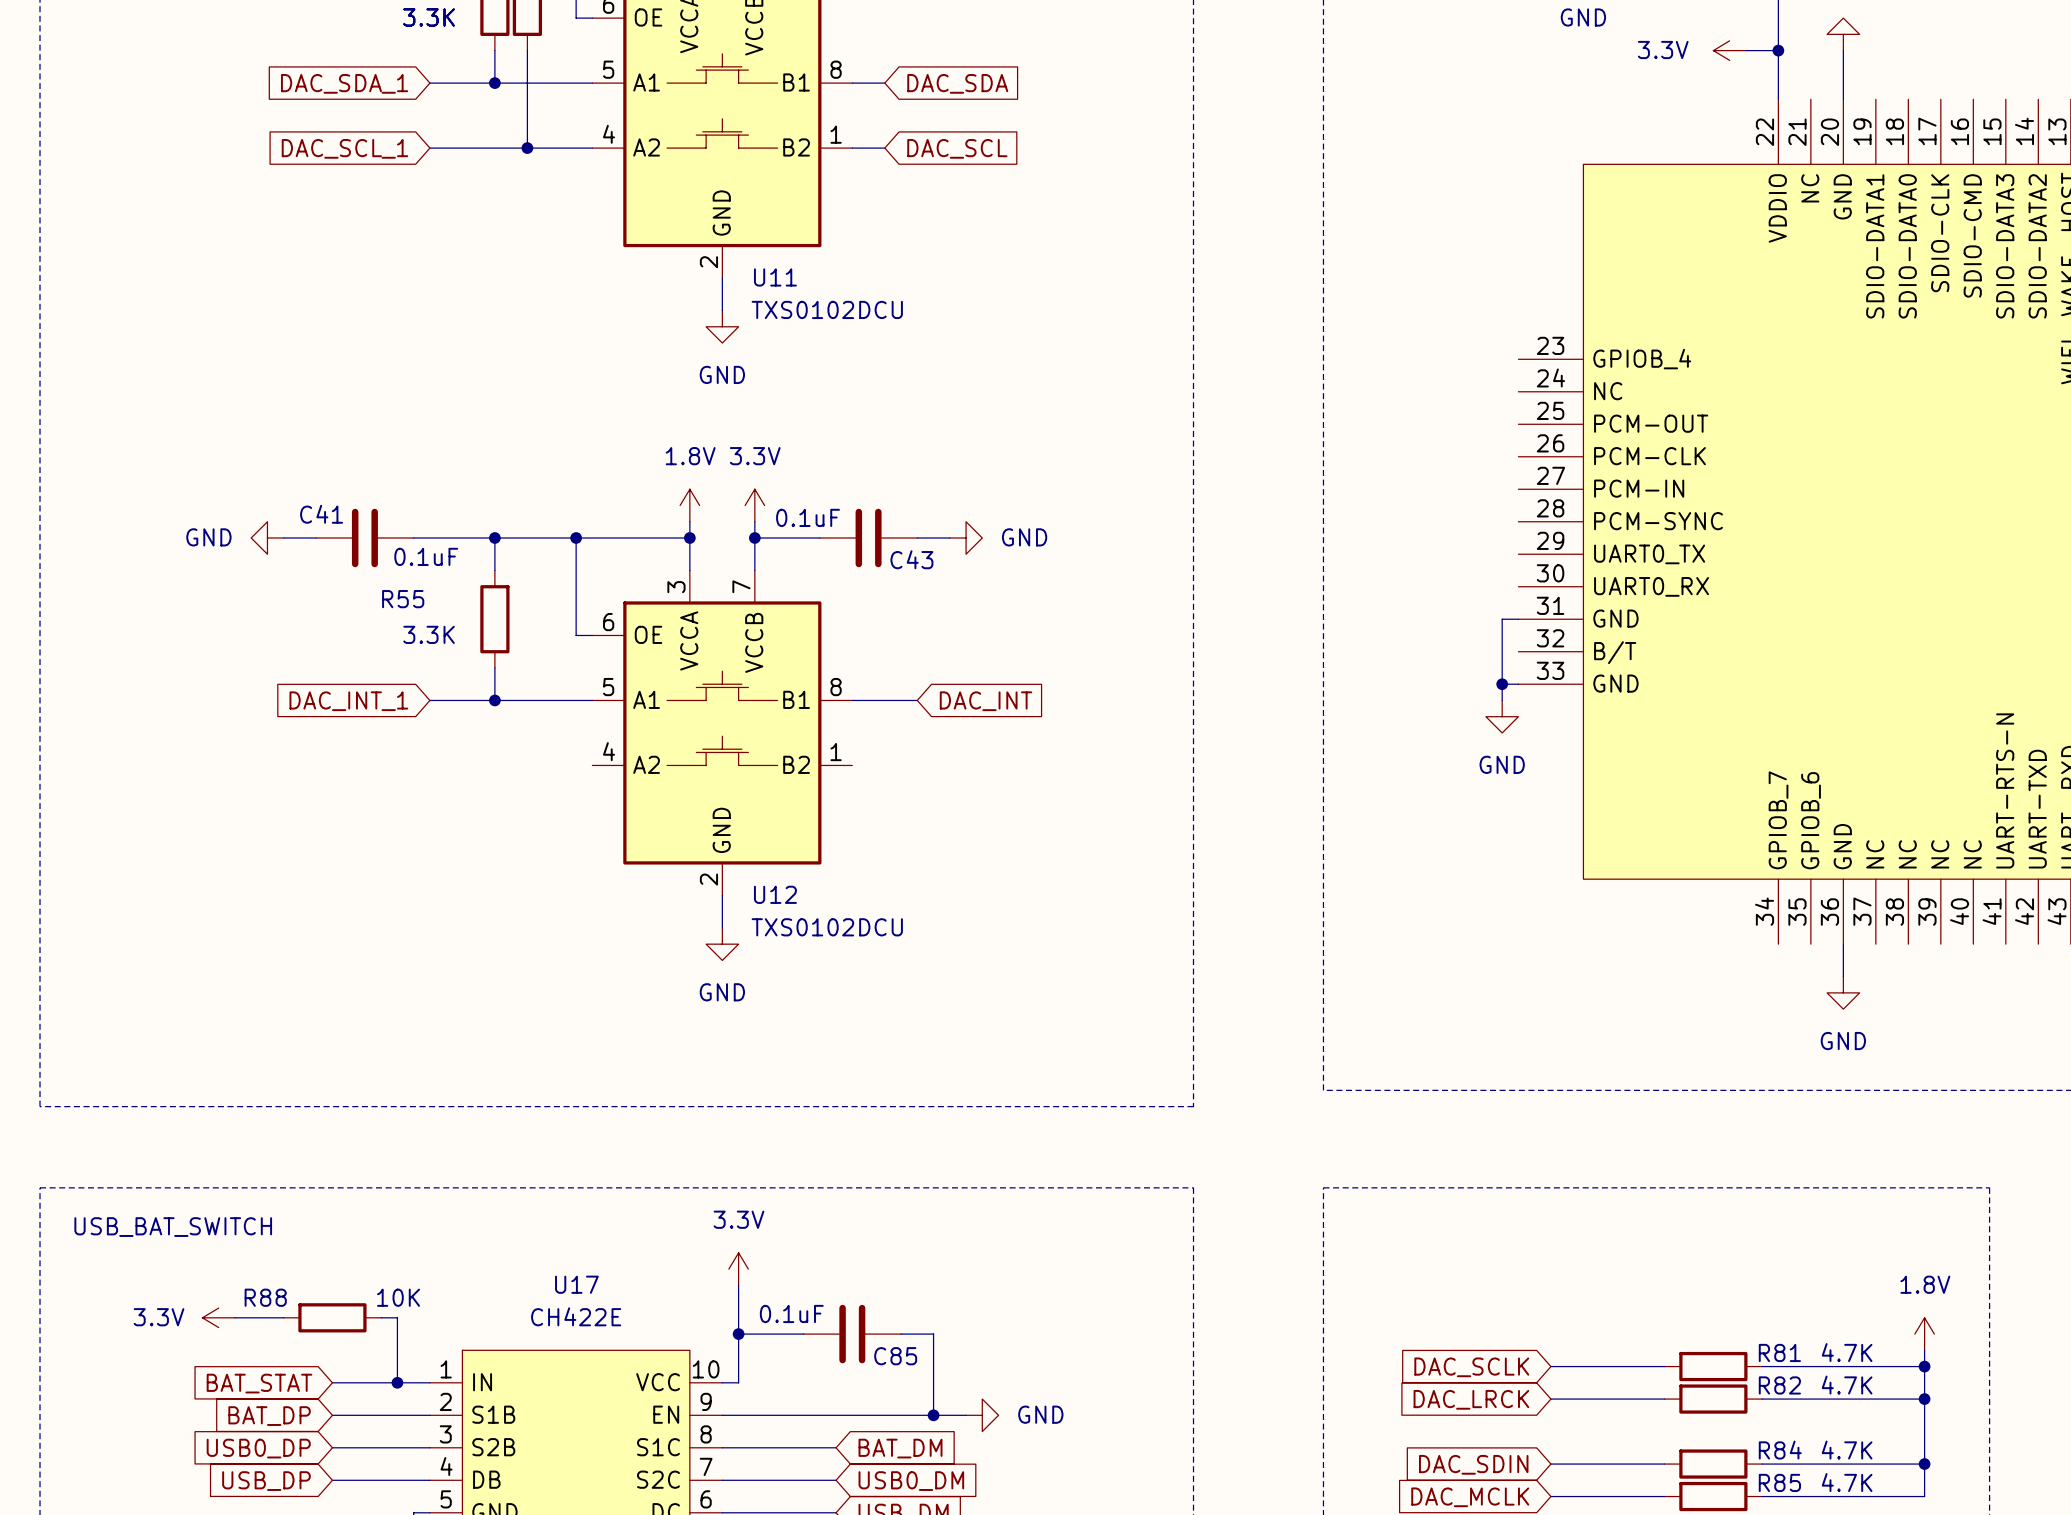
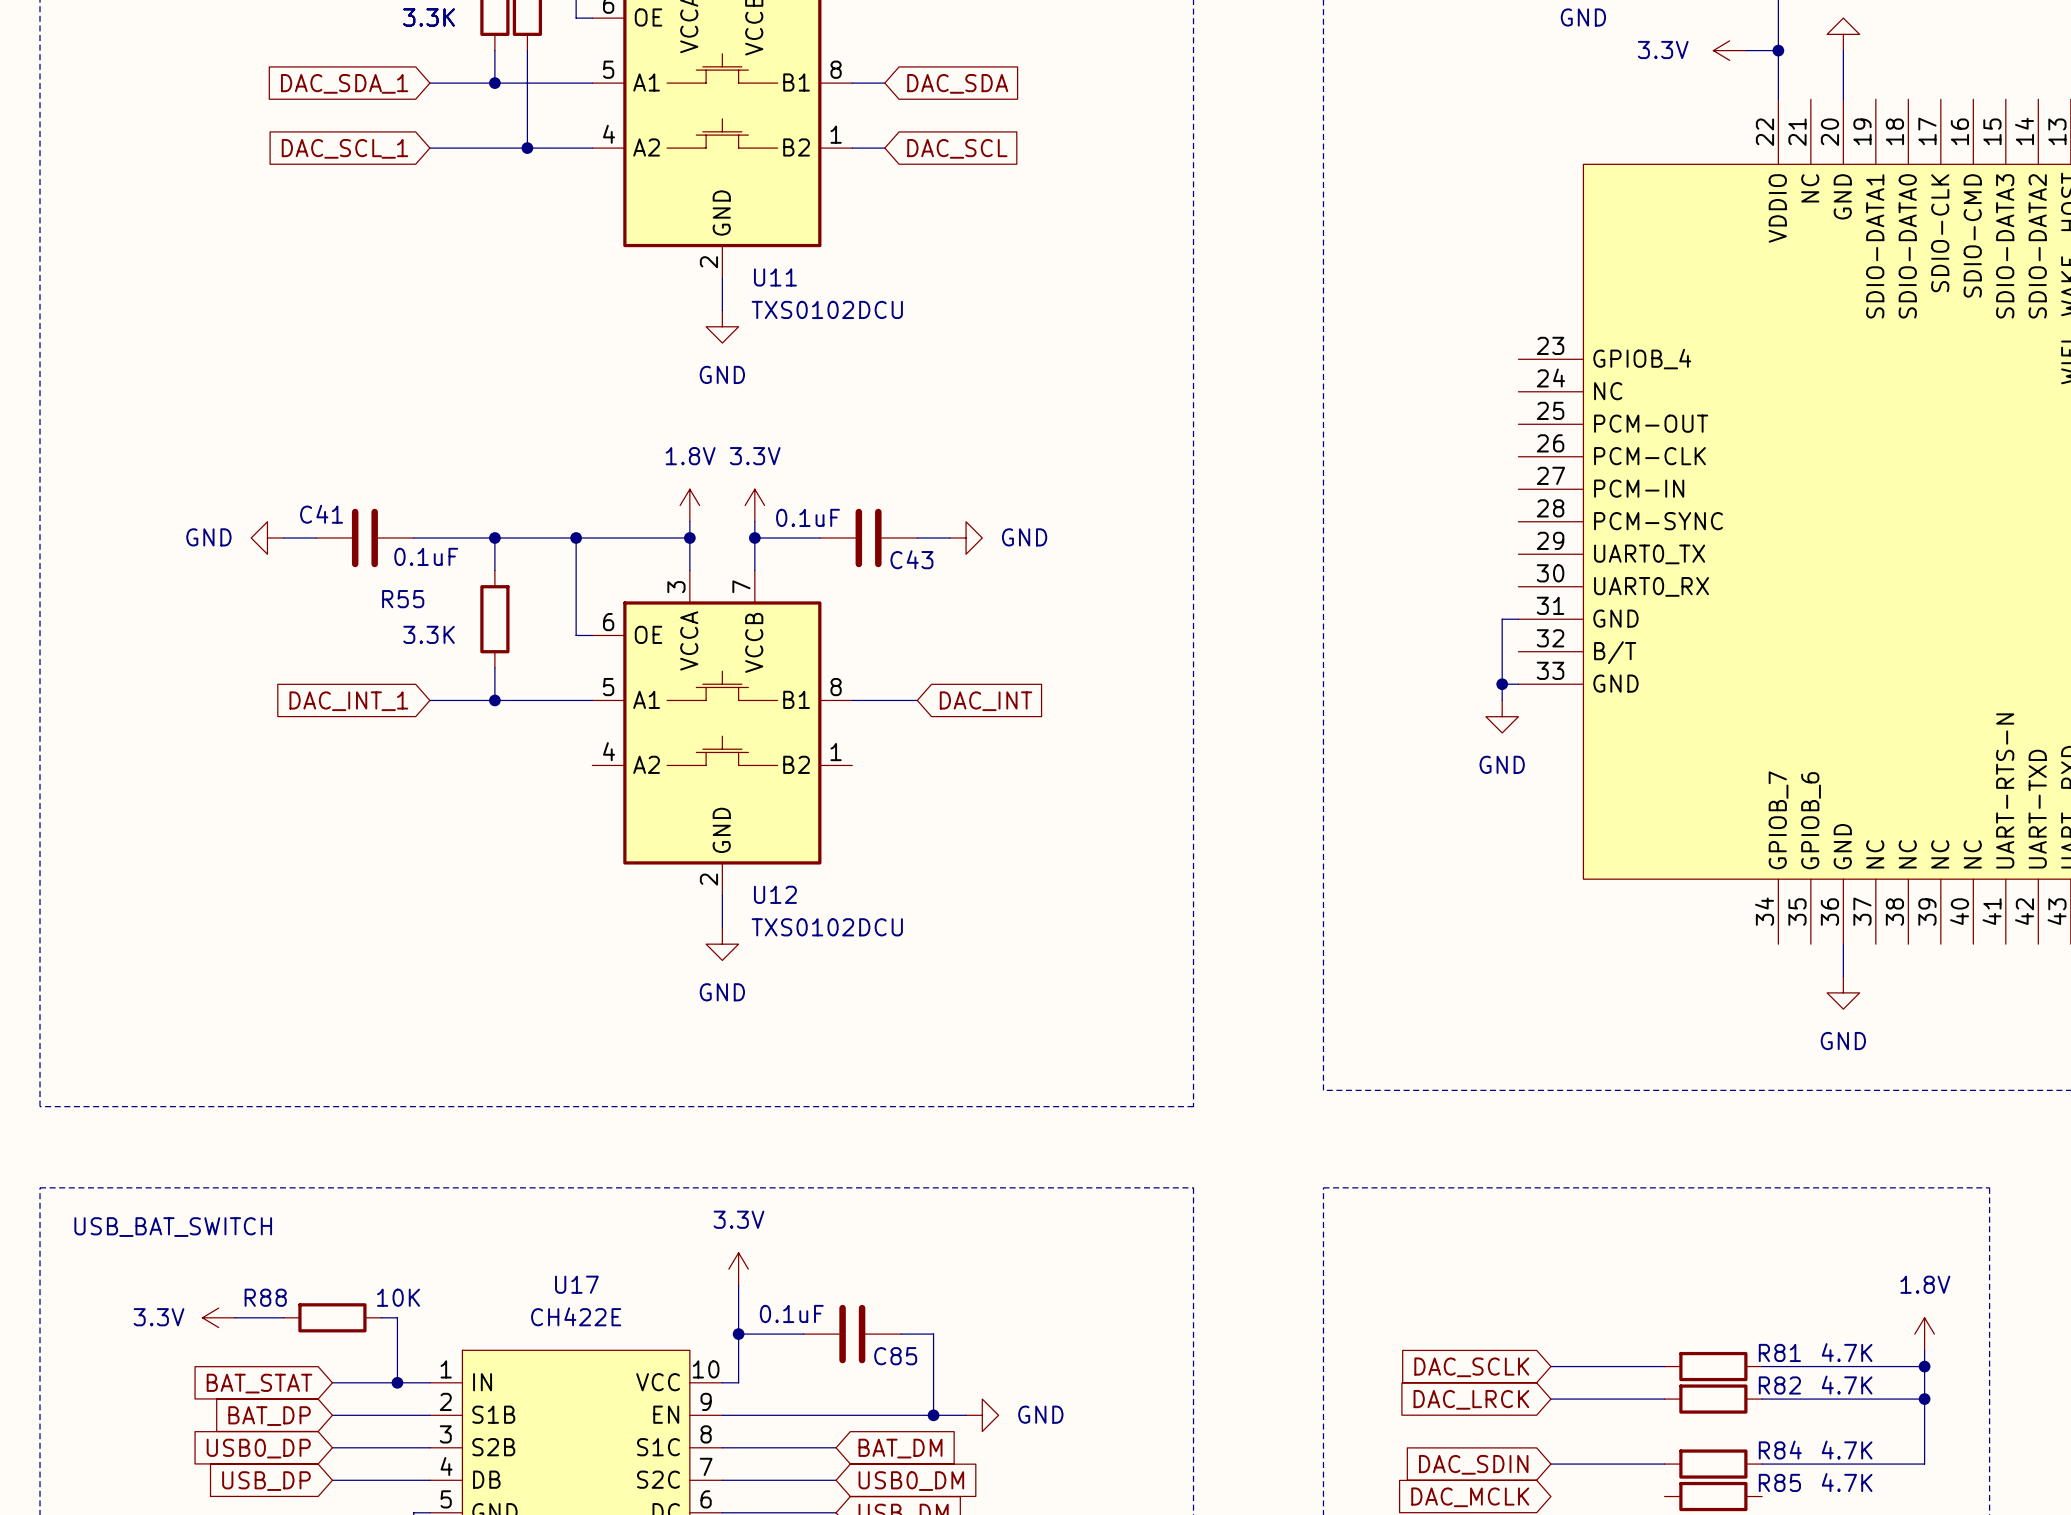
wire: (1924, 1464) (1924, 1496) (1762, 1496) -> none
junction: (1924, 1464) -> none
wire: (1550, 1496) (1664, 1496) -> none

